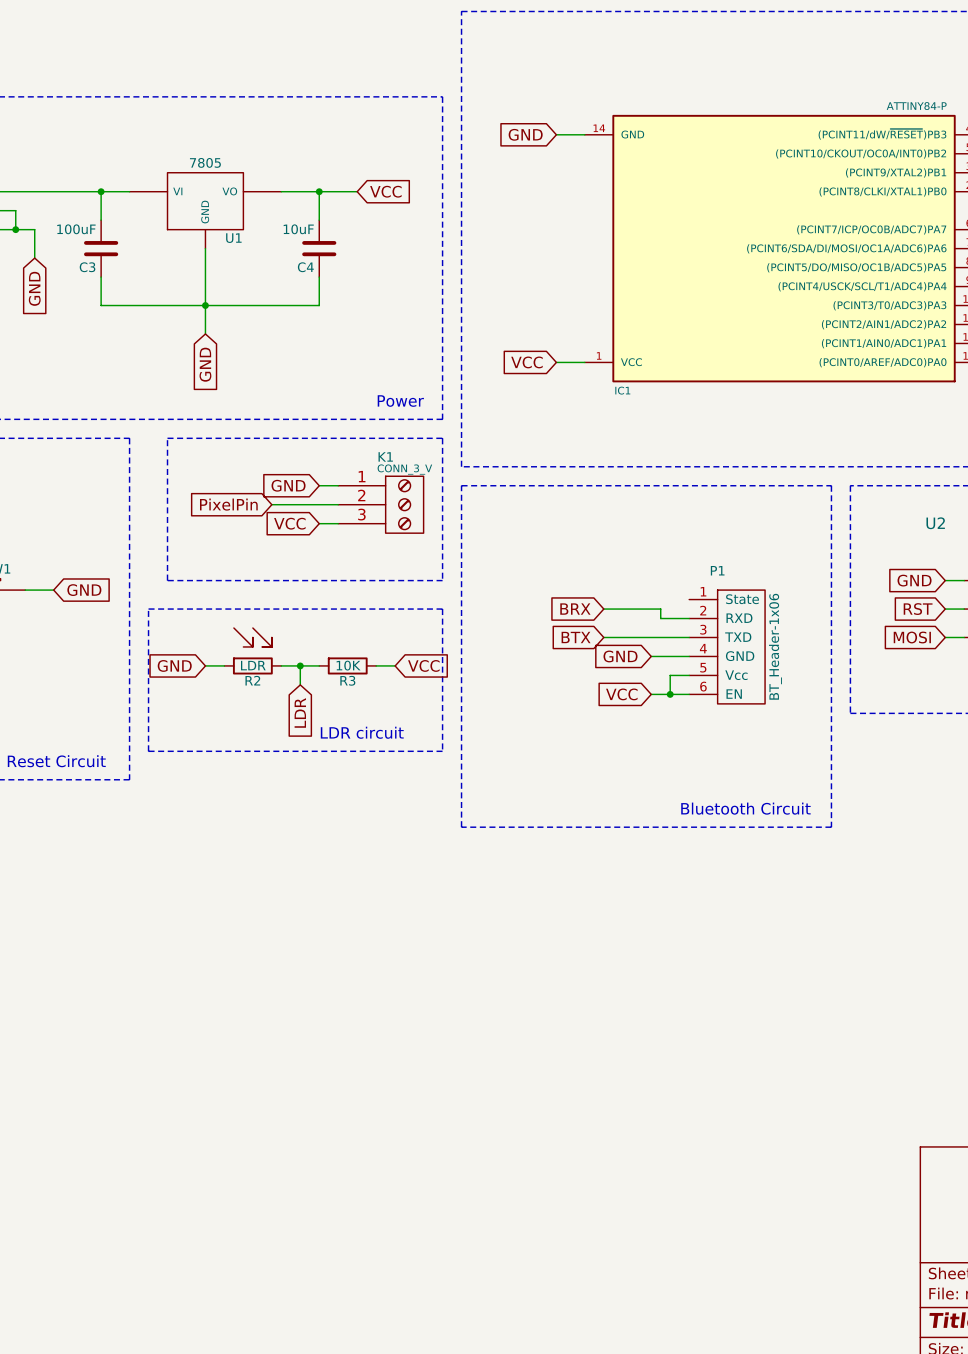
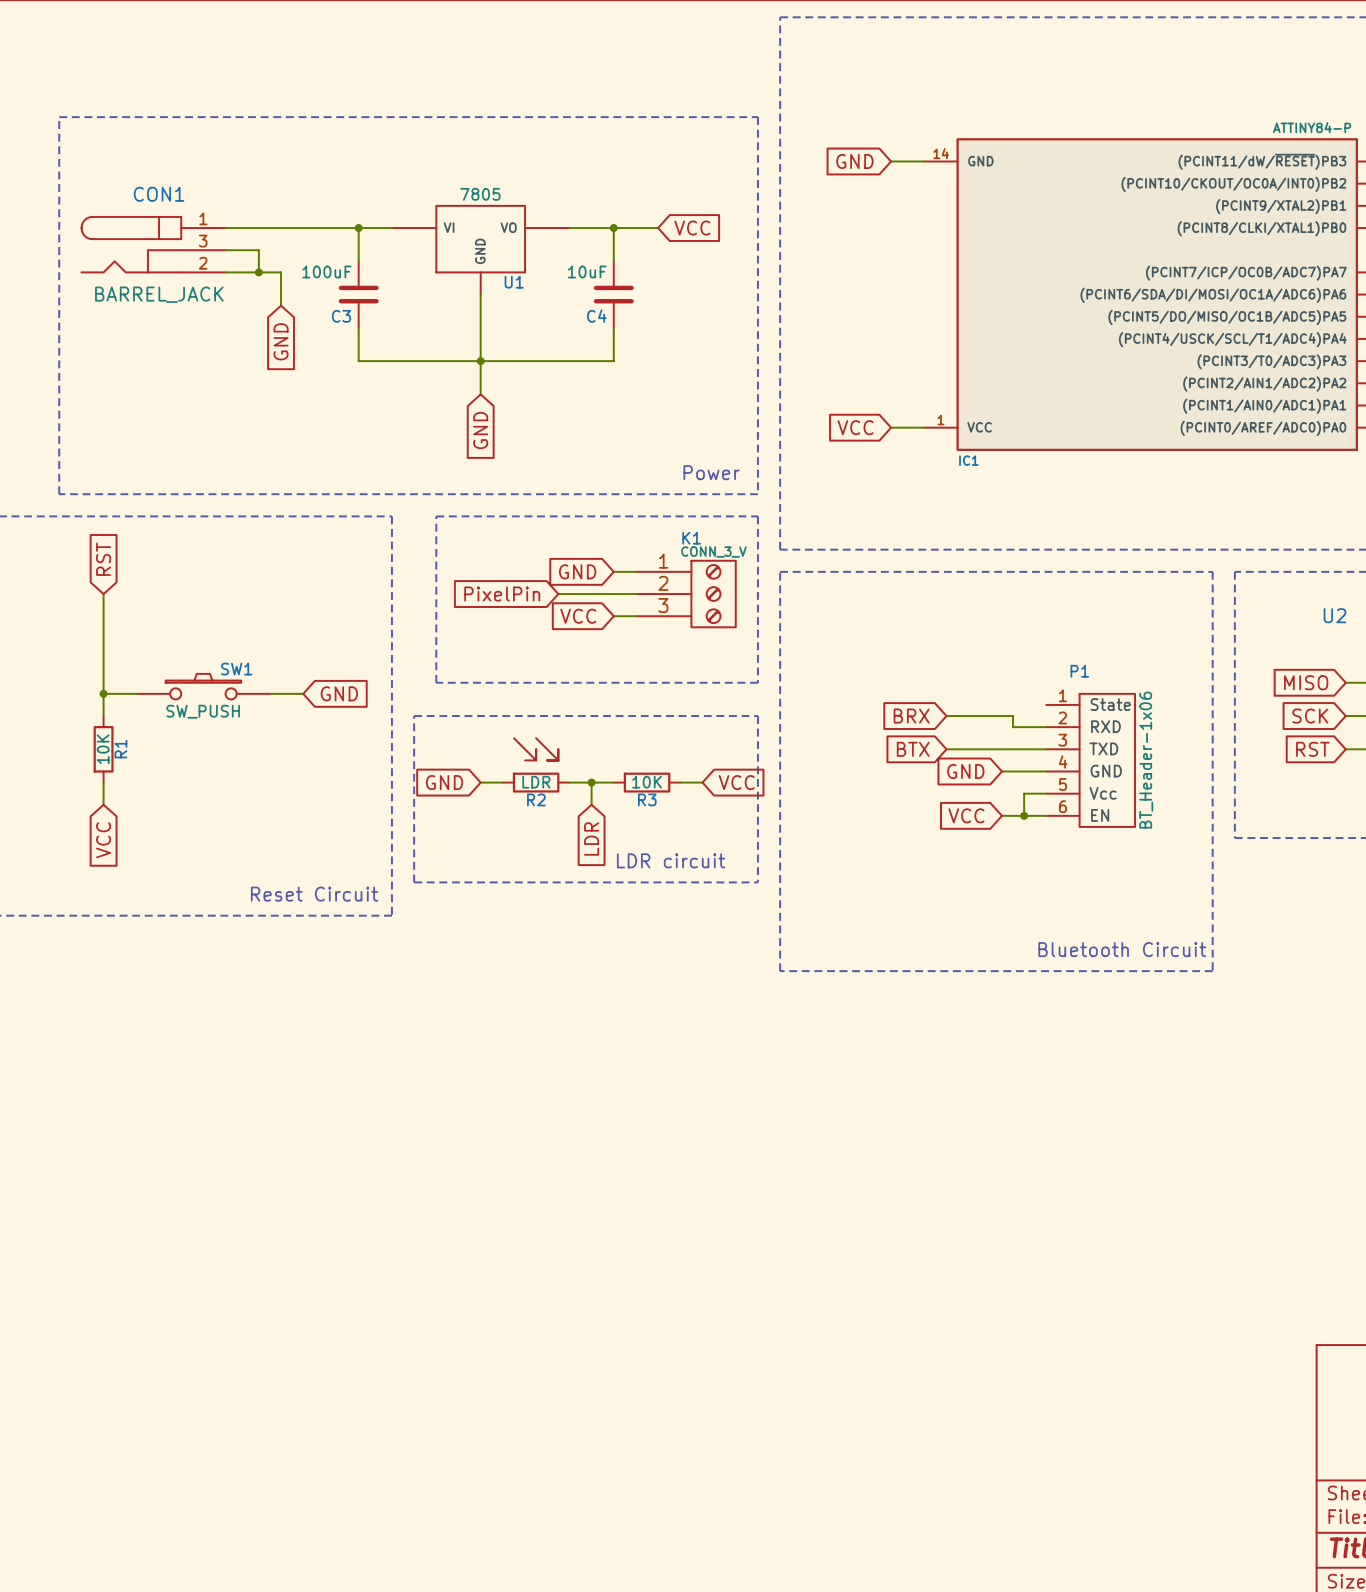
global label: GND (914, 580) -> MISO (1306, 682)
global label: RST (918, 609) -> SCK (1310, 716)
global label: MOSI (912, 637) -> RST (1312, 749)

